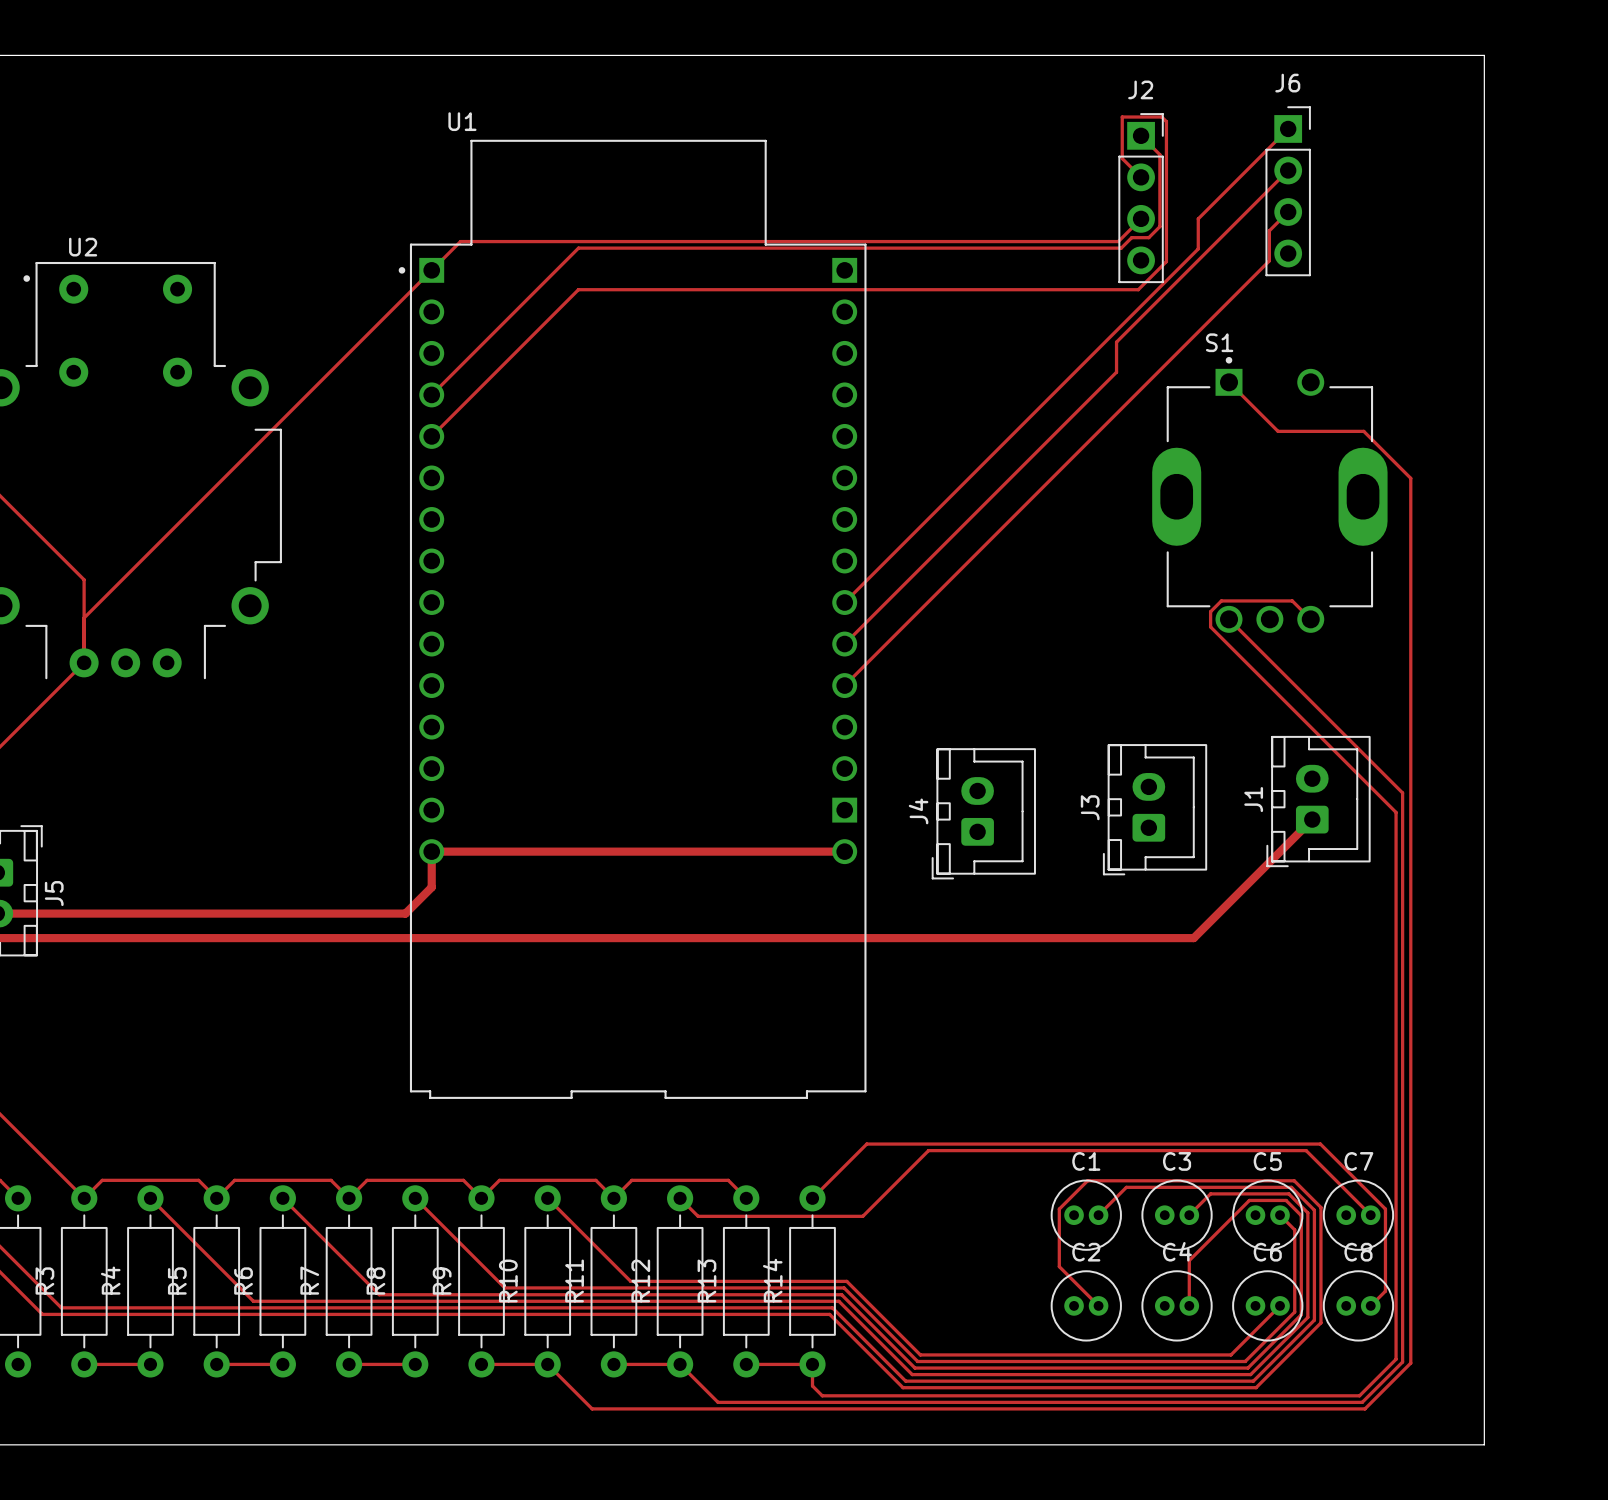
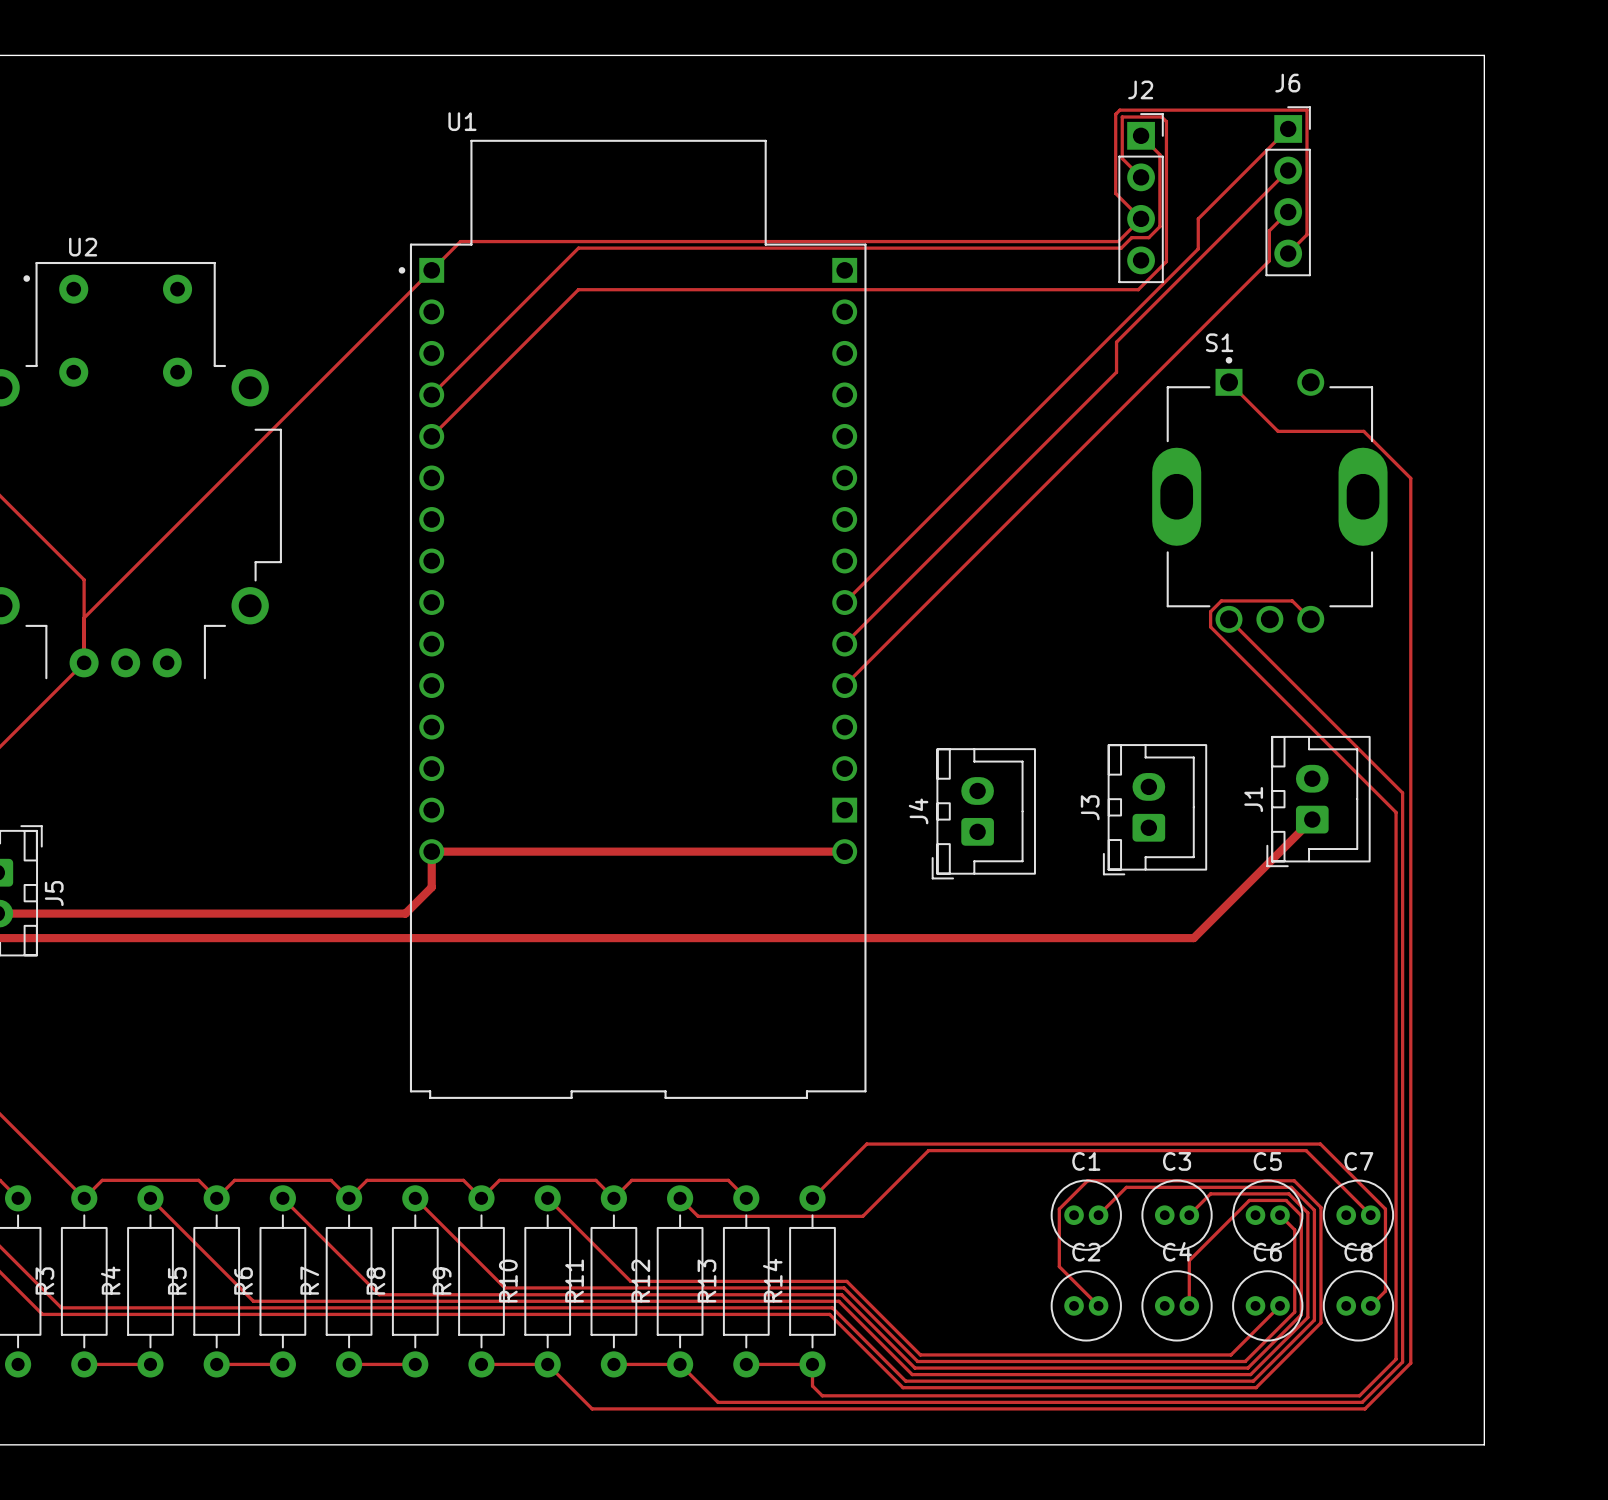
track: none -> (1141, 218) (1115, 193) (1115, 114) (1119, 110) (1307, 110) (1307, 234) (1288, 253)

